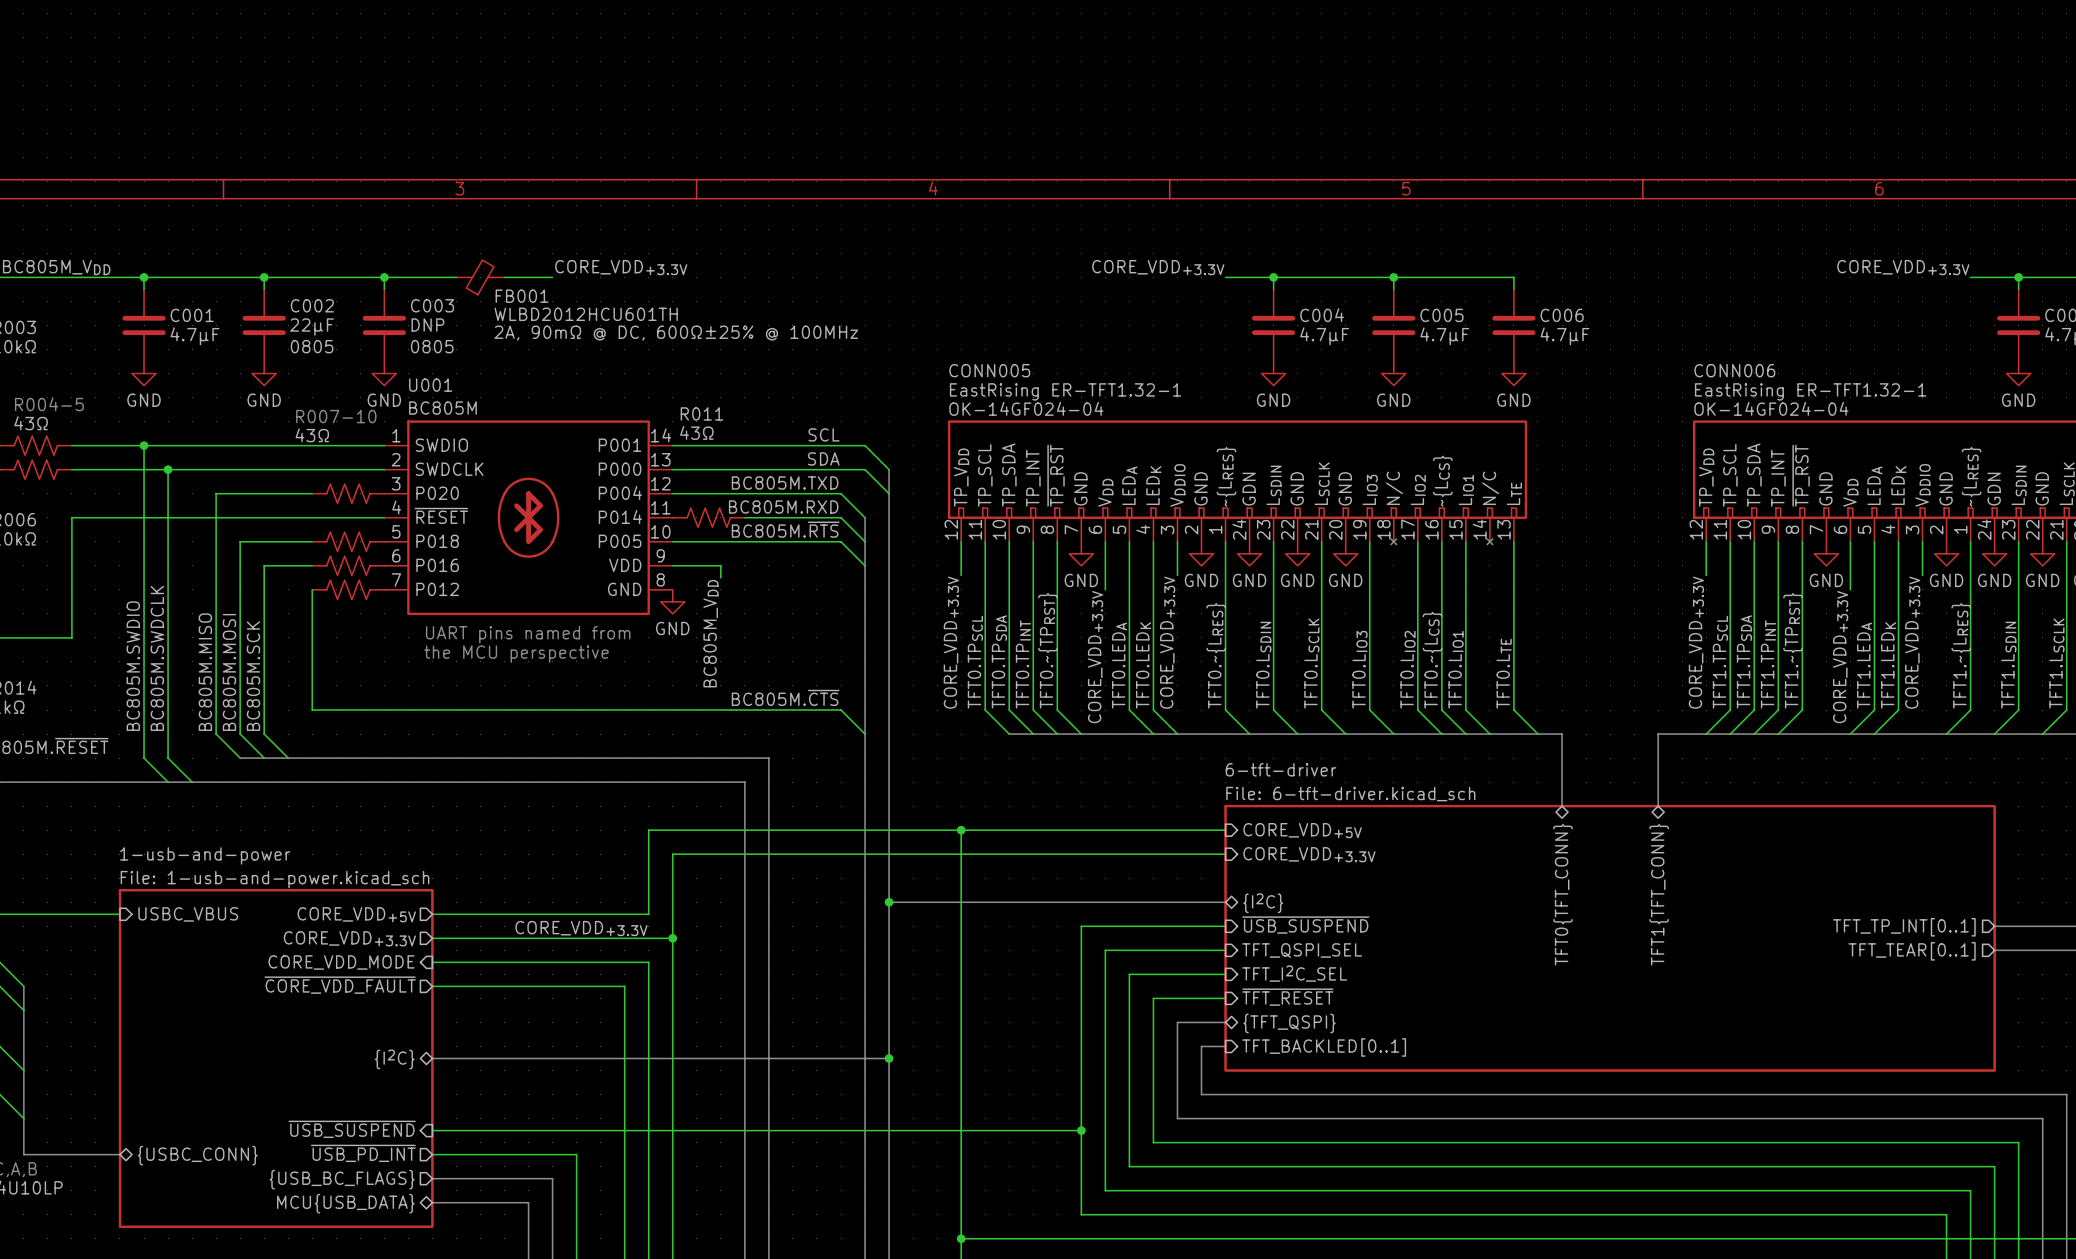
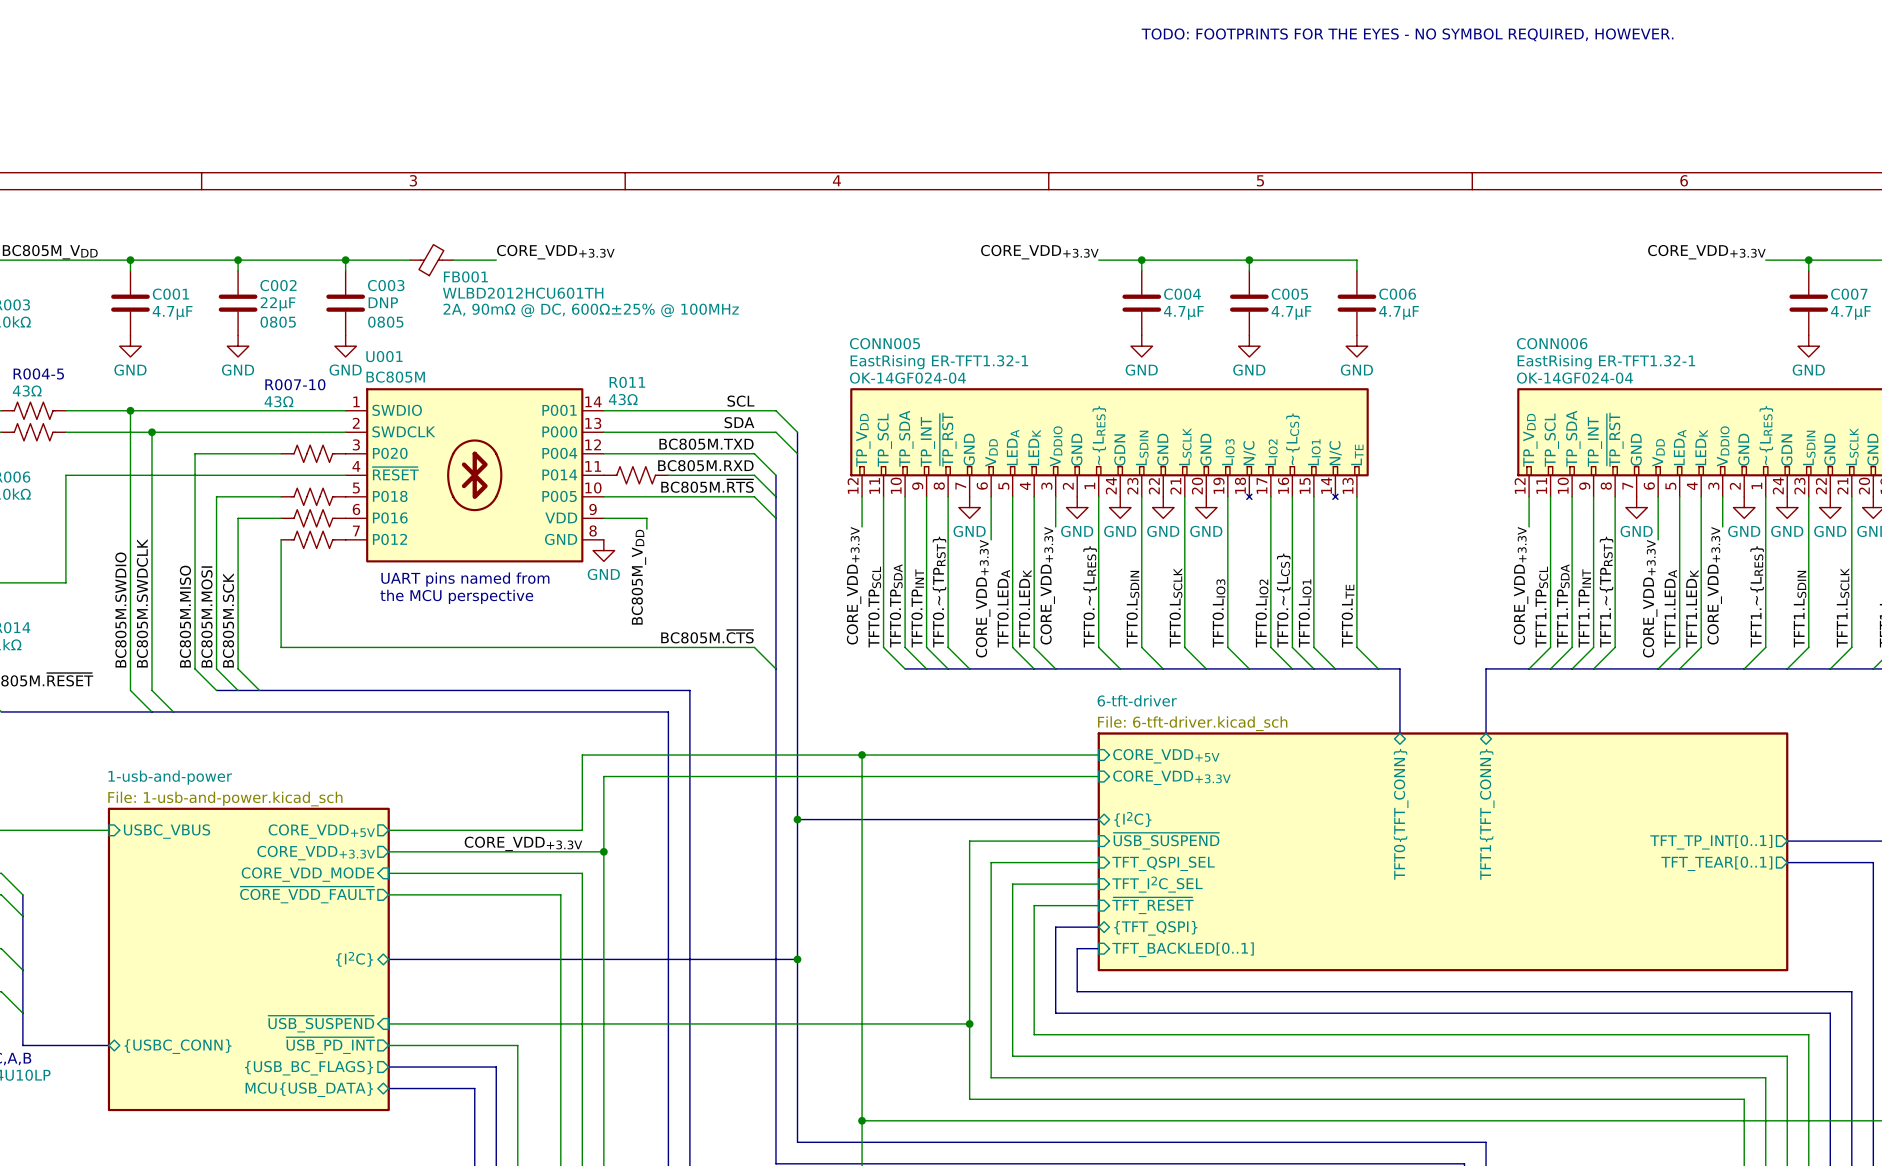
text: none -> TODO: FOOTPRINTS FOR THE EYES - NO SYMBOL REQUIRED, HOWEVER. (1407, 34)

